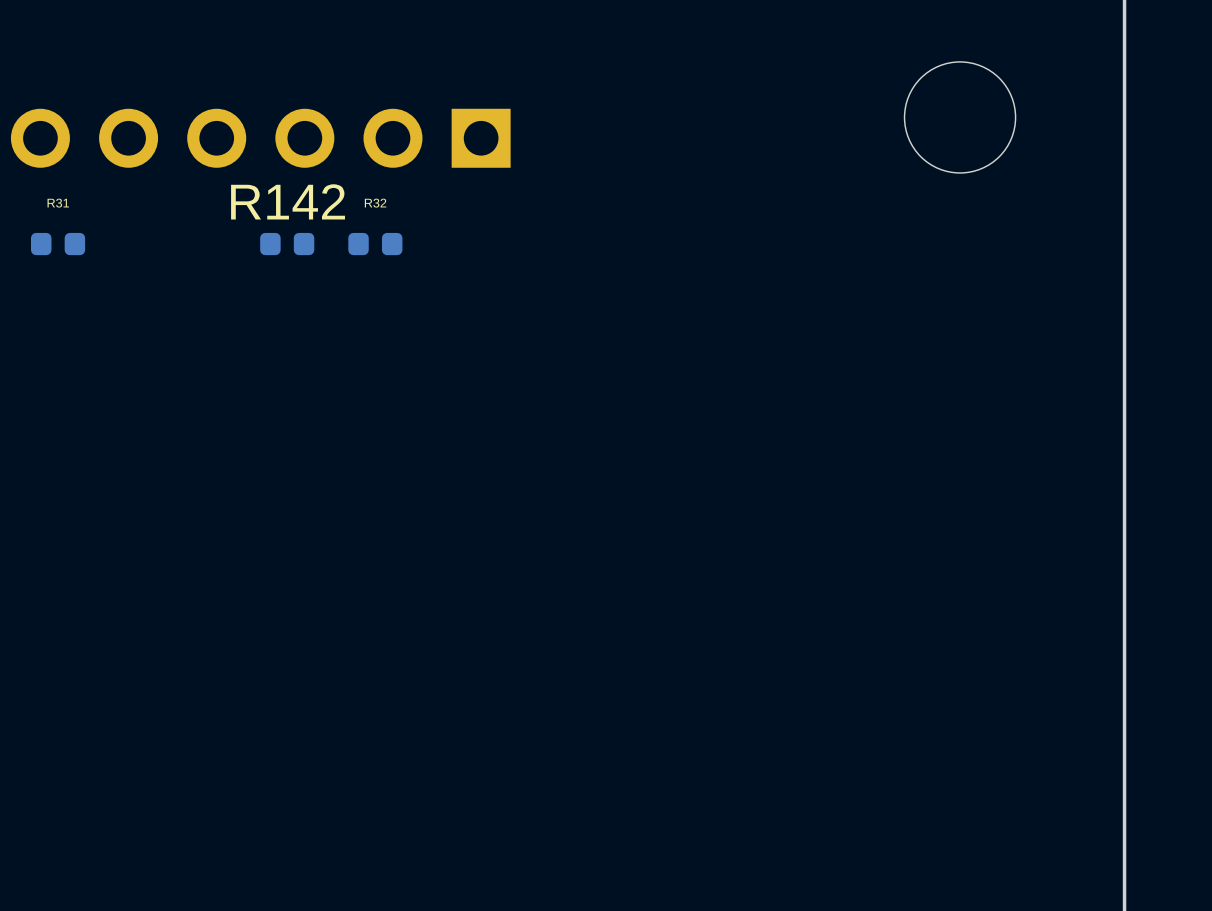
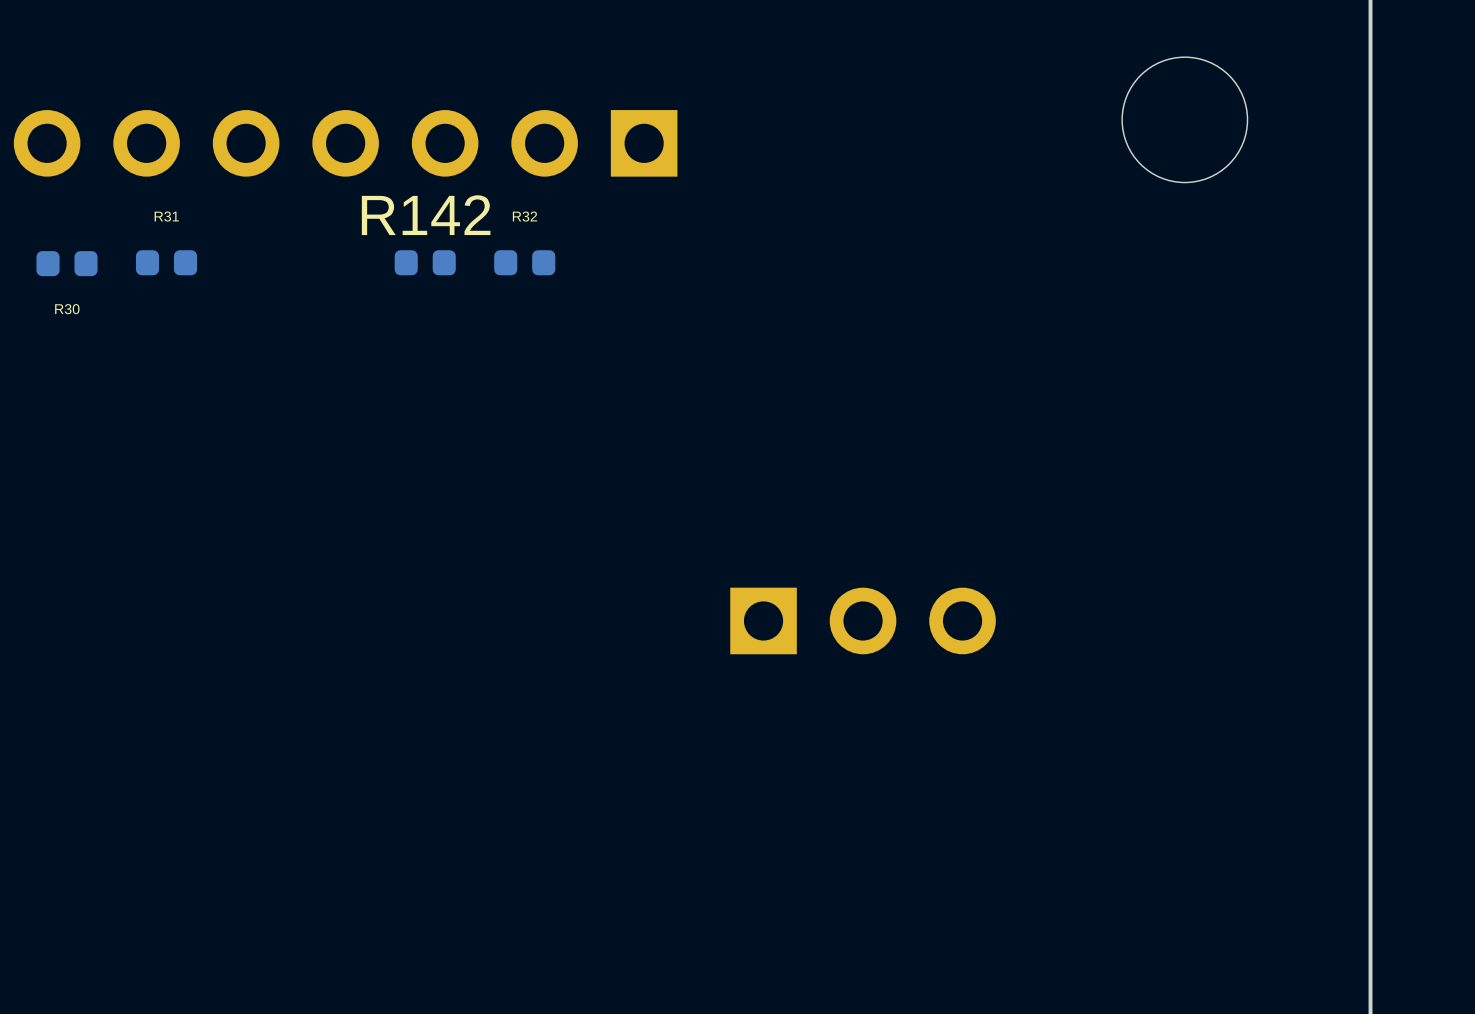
part: none -> (863, 620)

